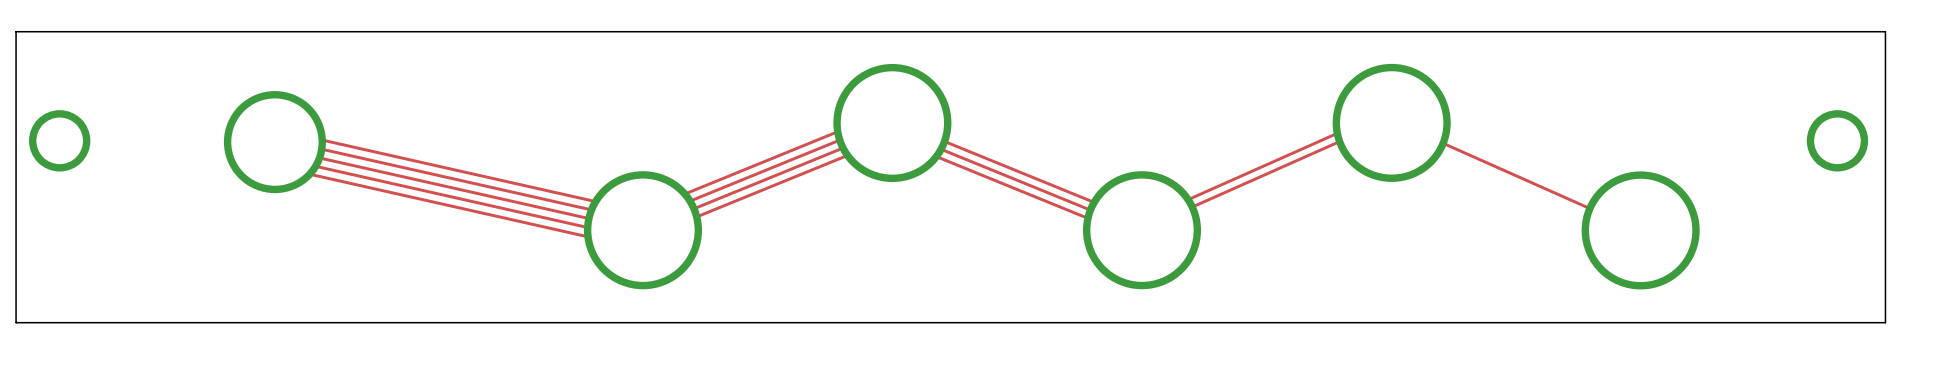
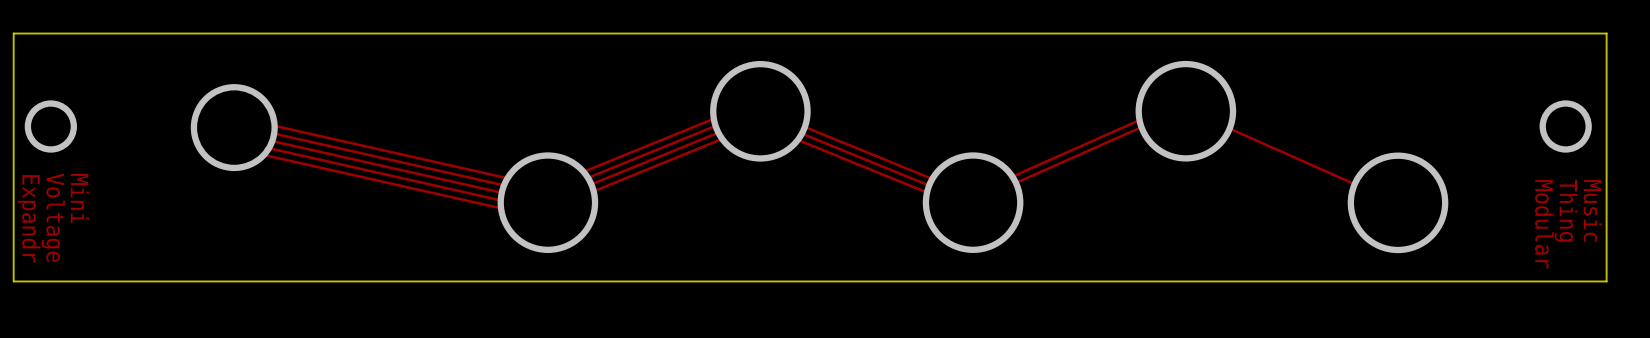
text: none -> Mini (79, 198)
text: none -> Thing (1566, 210)
text: none -> Music (1592, 210)
text: none -> Voltage (53, 217)
text: none -> Expandr (28, 218)
text: none -> Modular (1544, 224)

